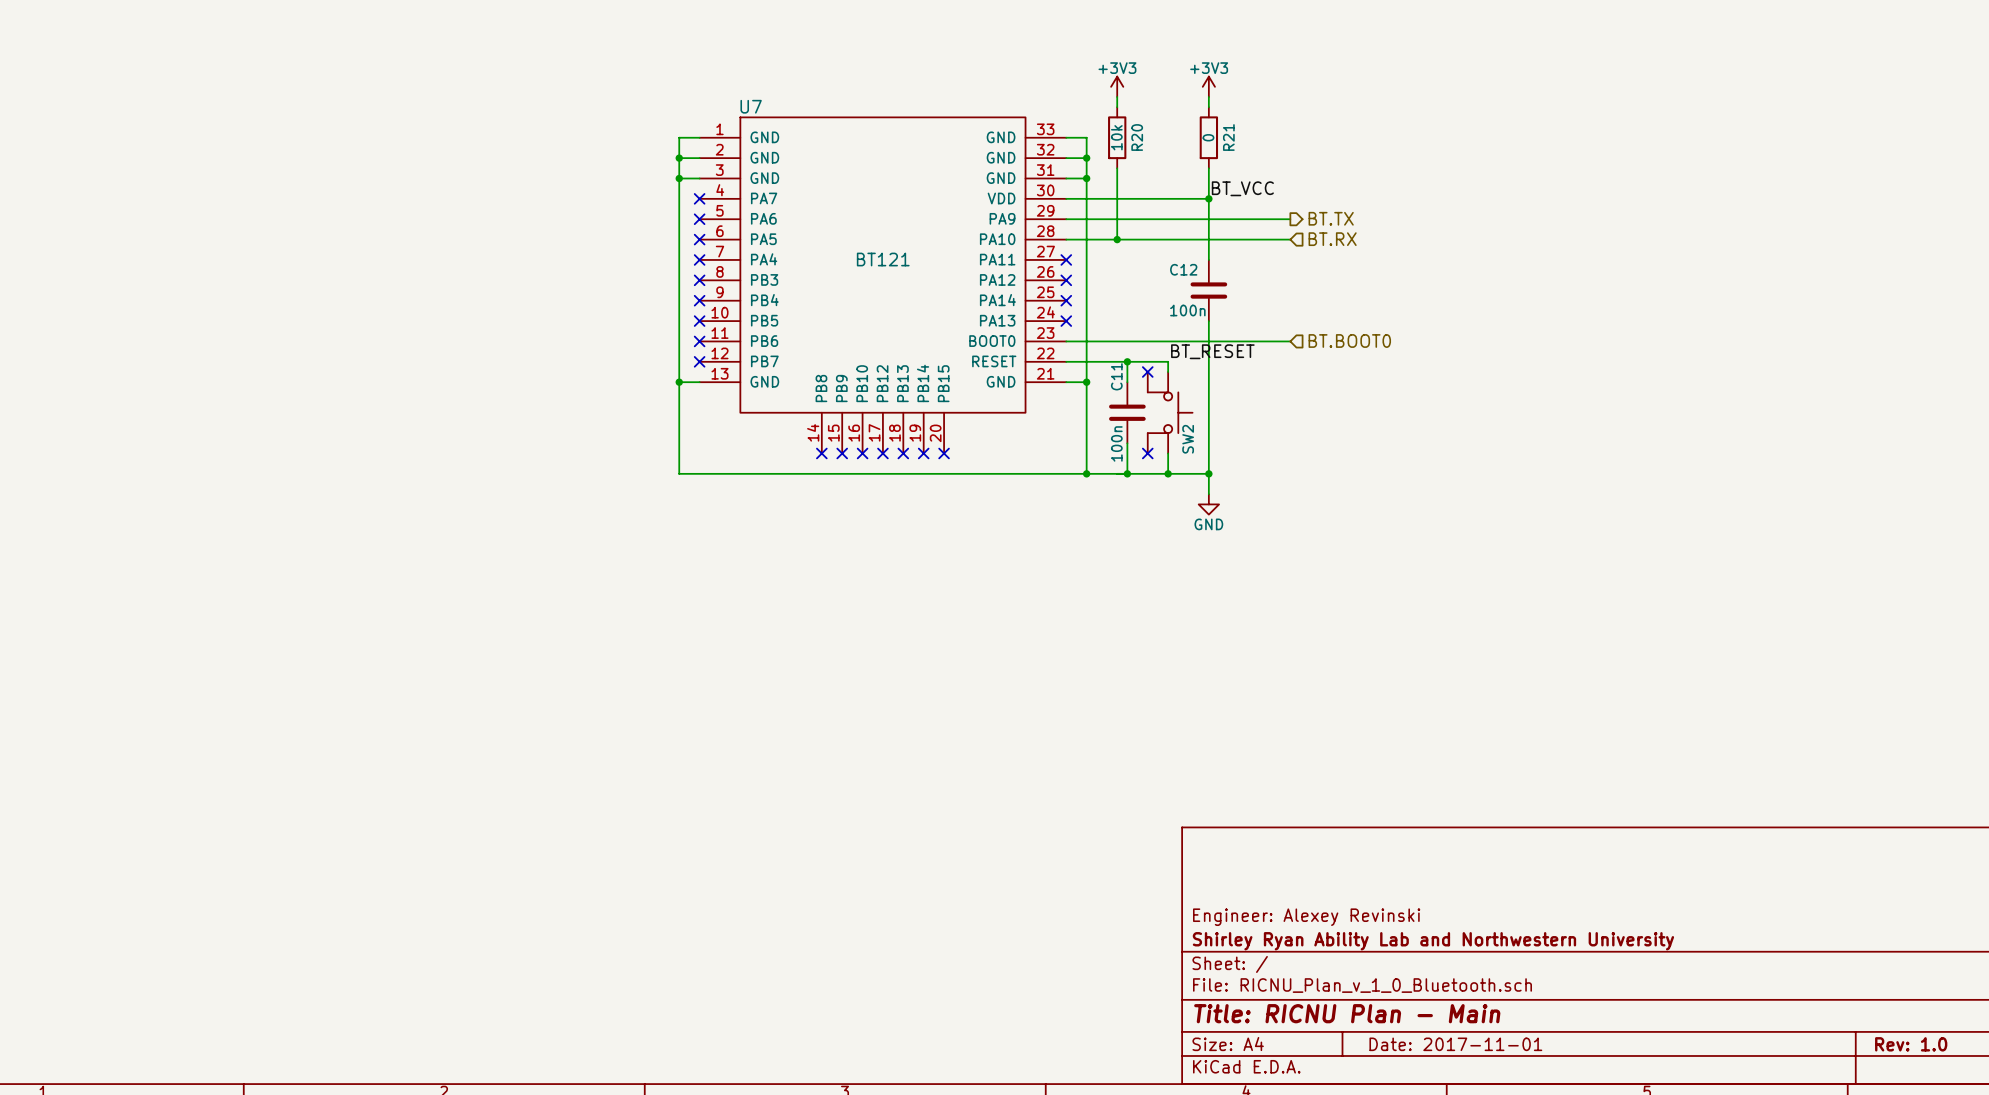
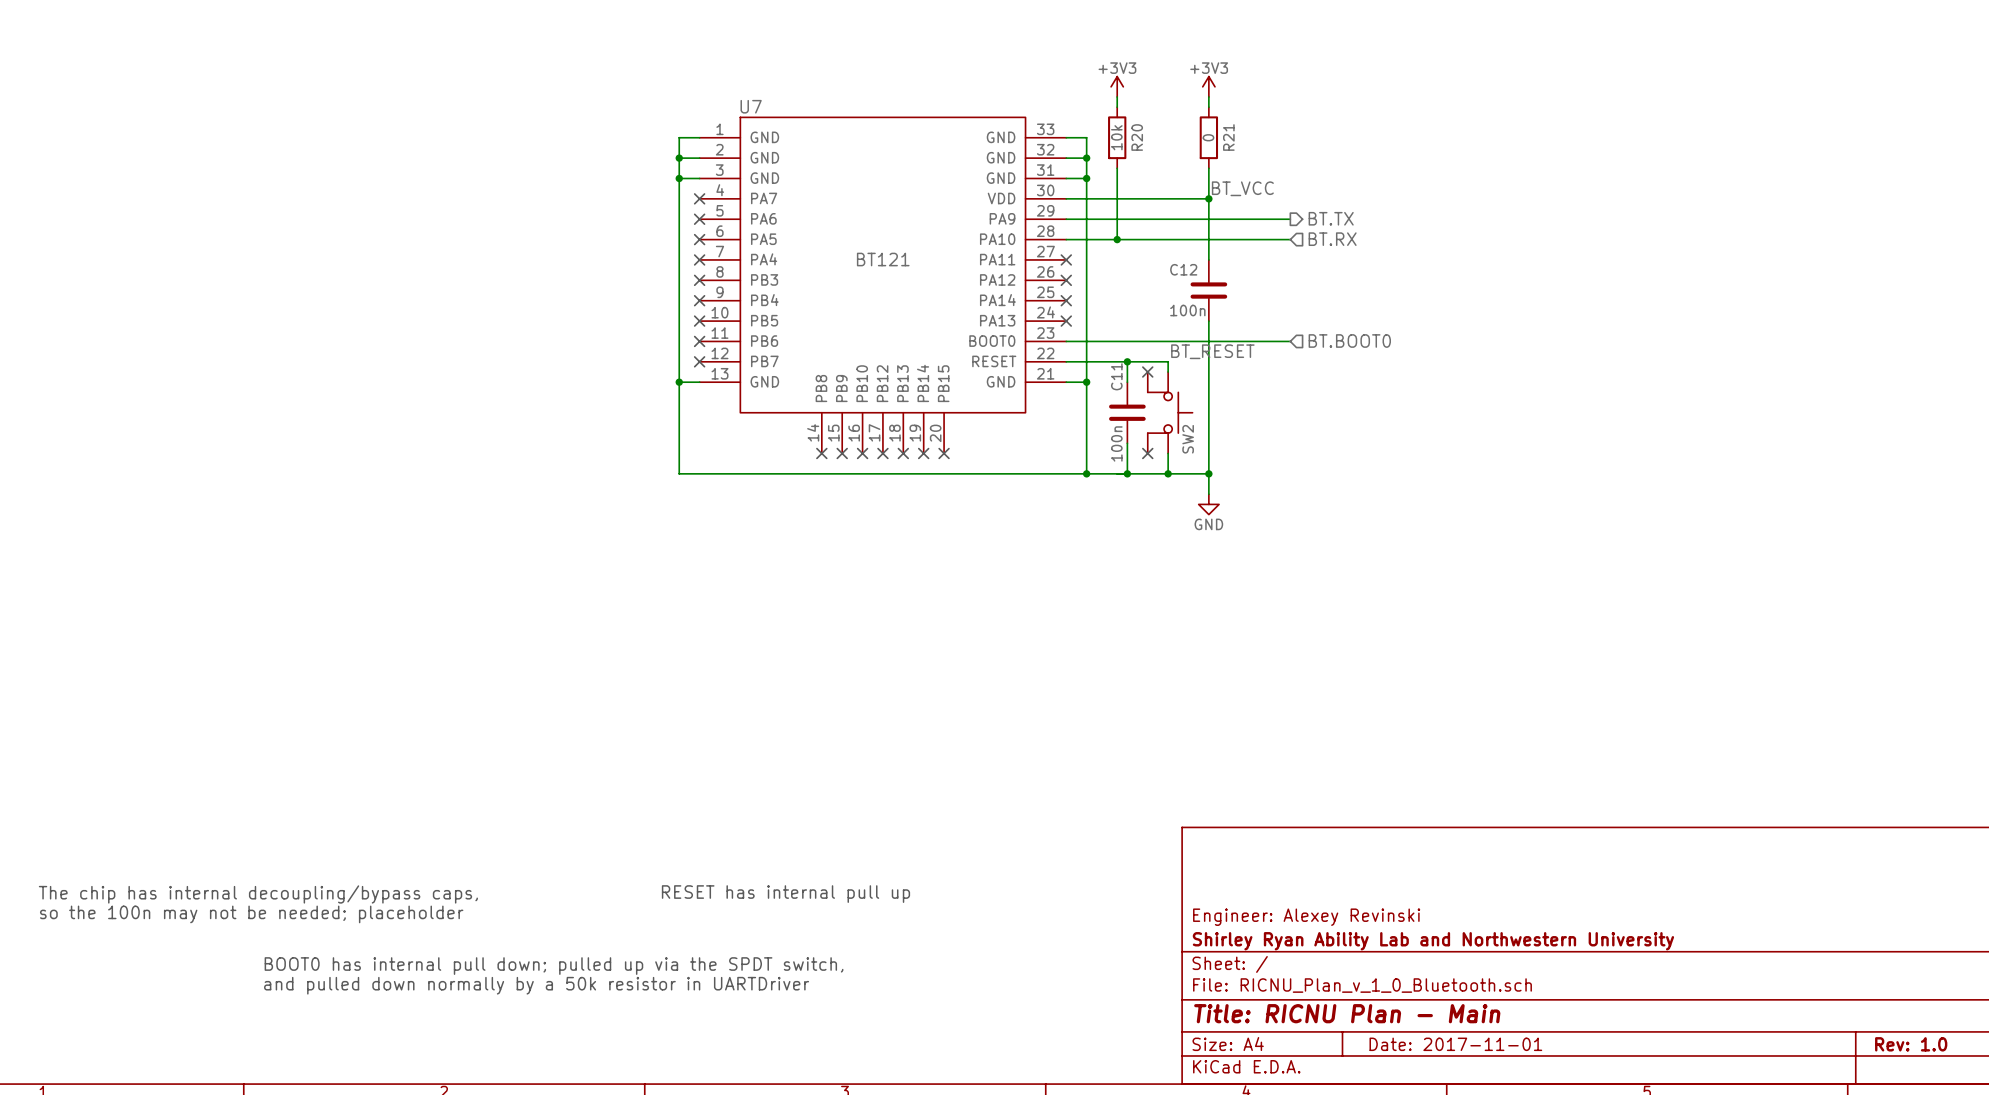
text: none -> The chip has internal decoupling/bypass caps, (258, 894)
text: none -> RESET has internal pull up (785, 894)
text: none -> so the 100n may not be needed; placeholder (251, 914)
text: none -> BOOT0 has internal pull down; pulled up via the SPDT switch, (554, 966)
text: none -> and pulled down normally by a 50k resistor in UARTDriver (536, 985)

